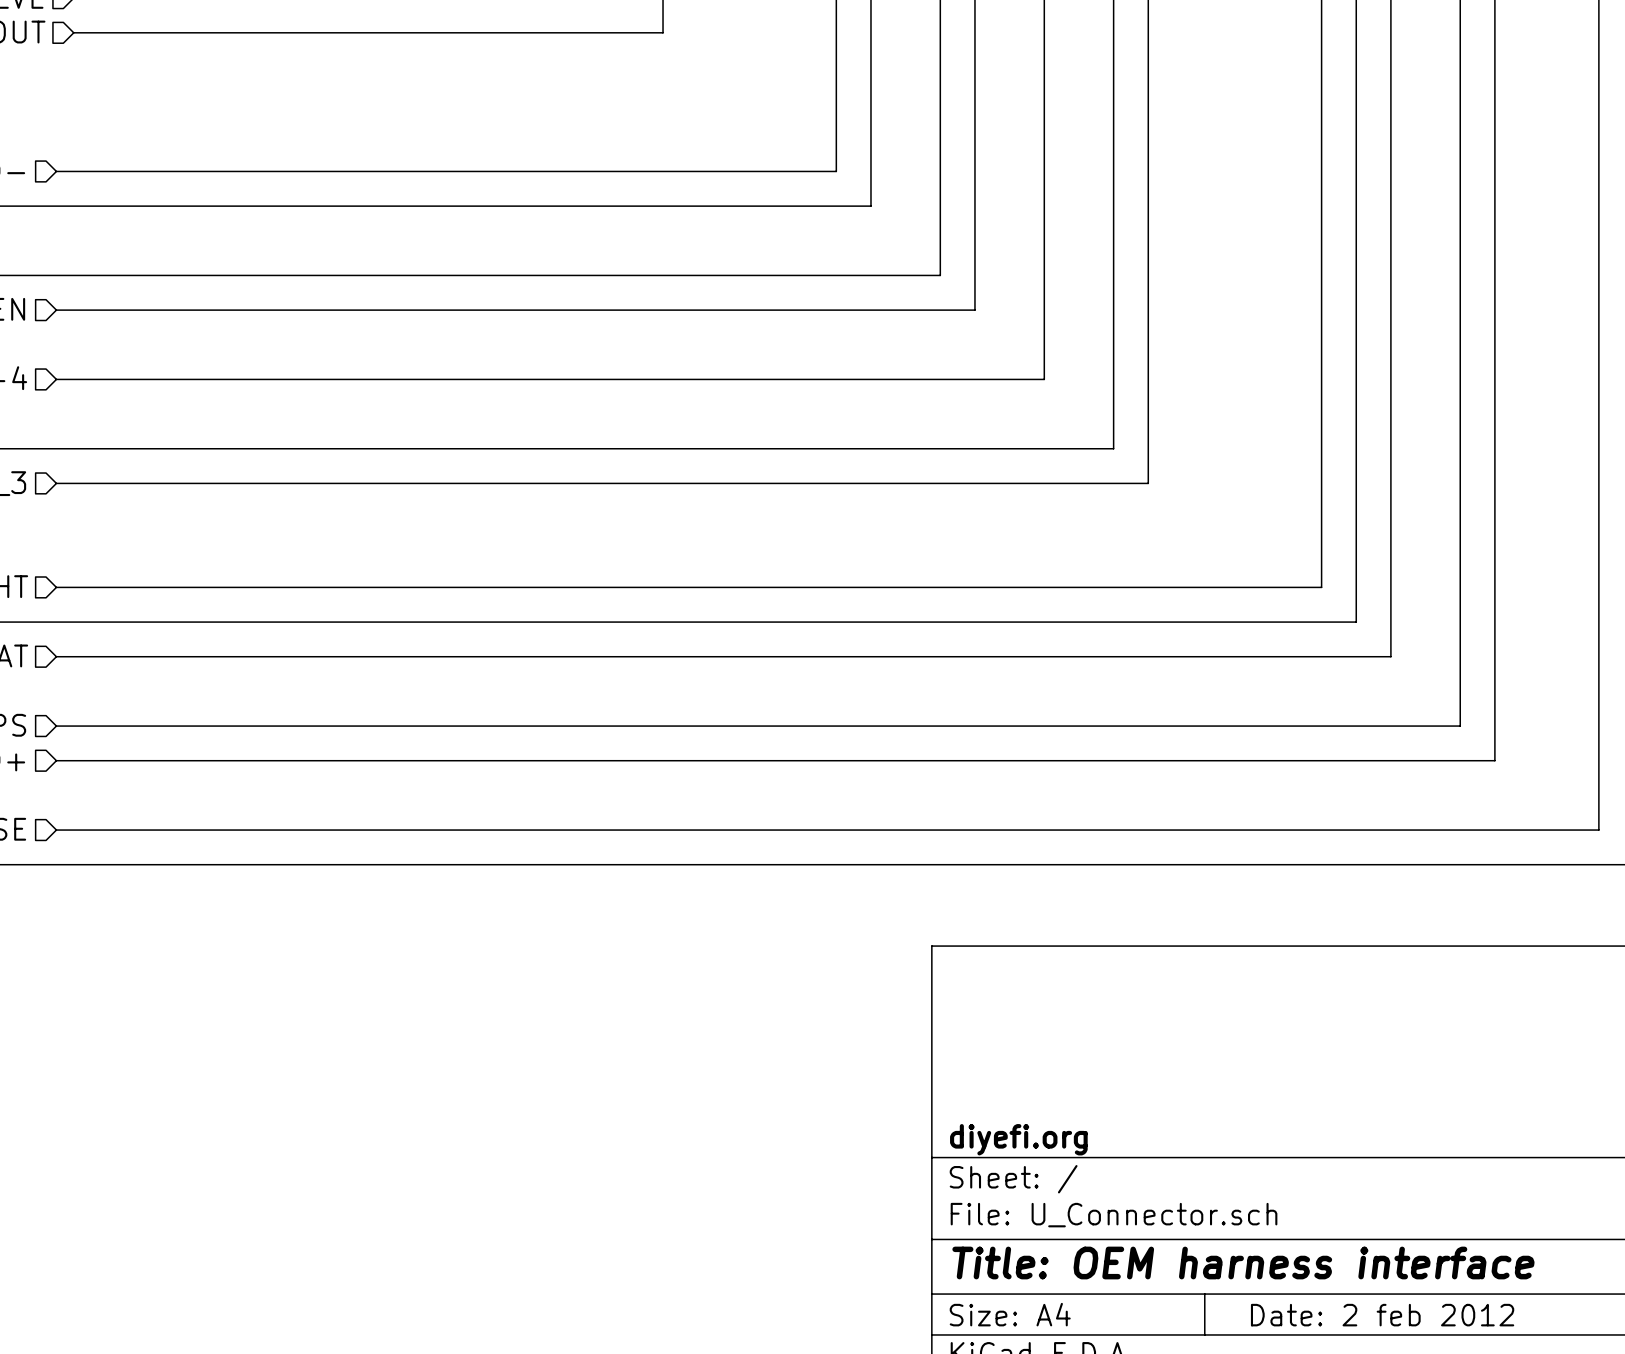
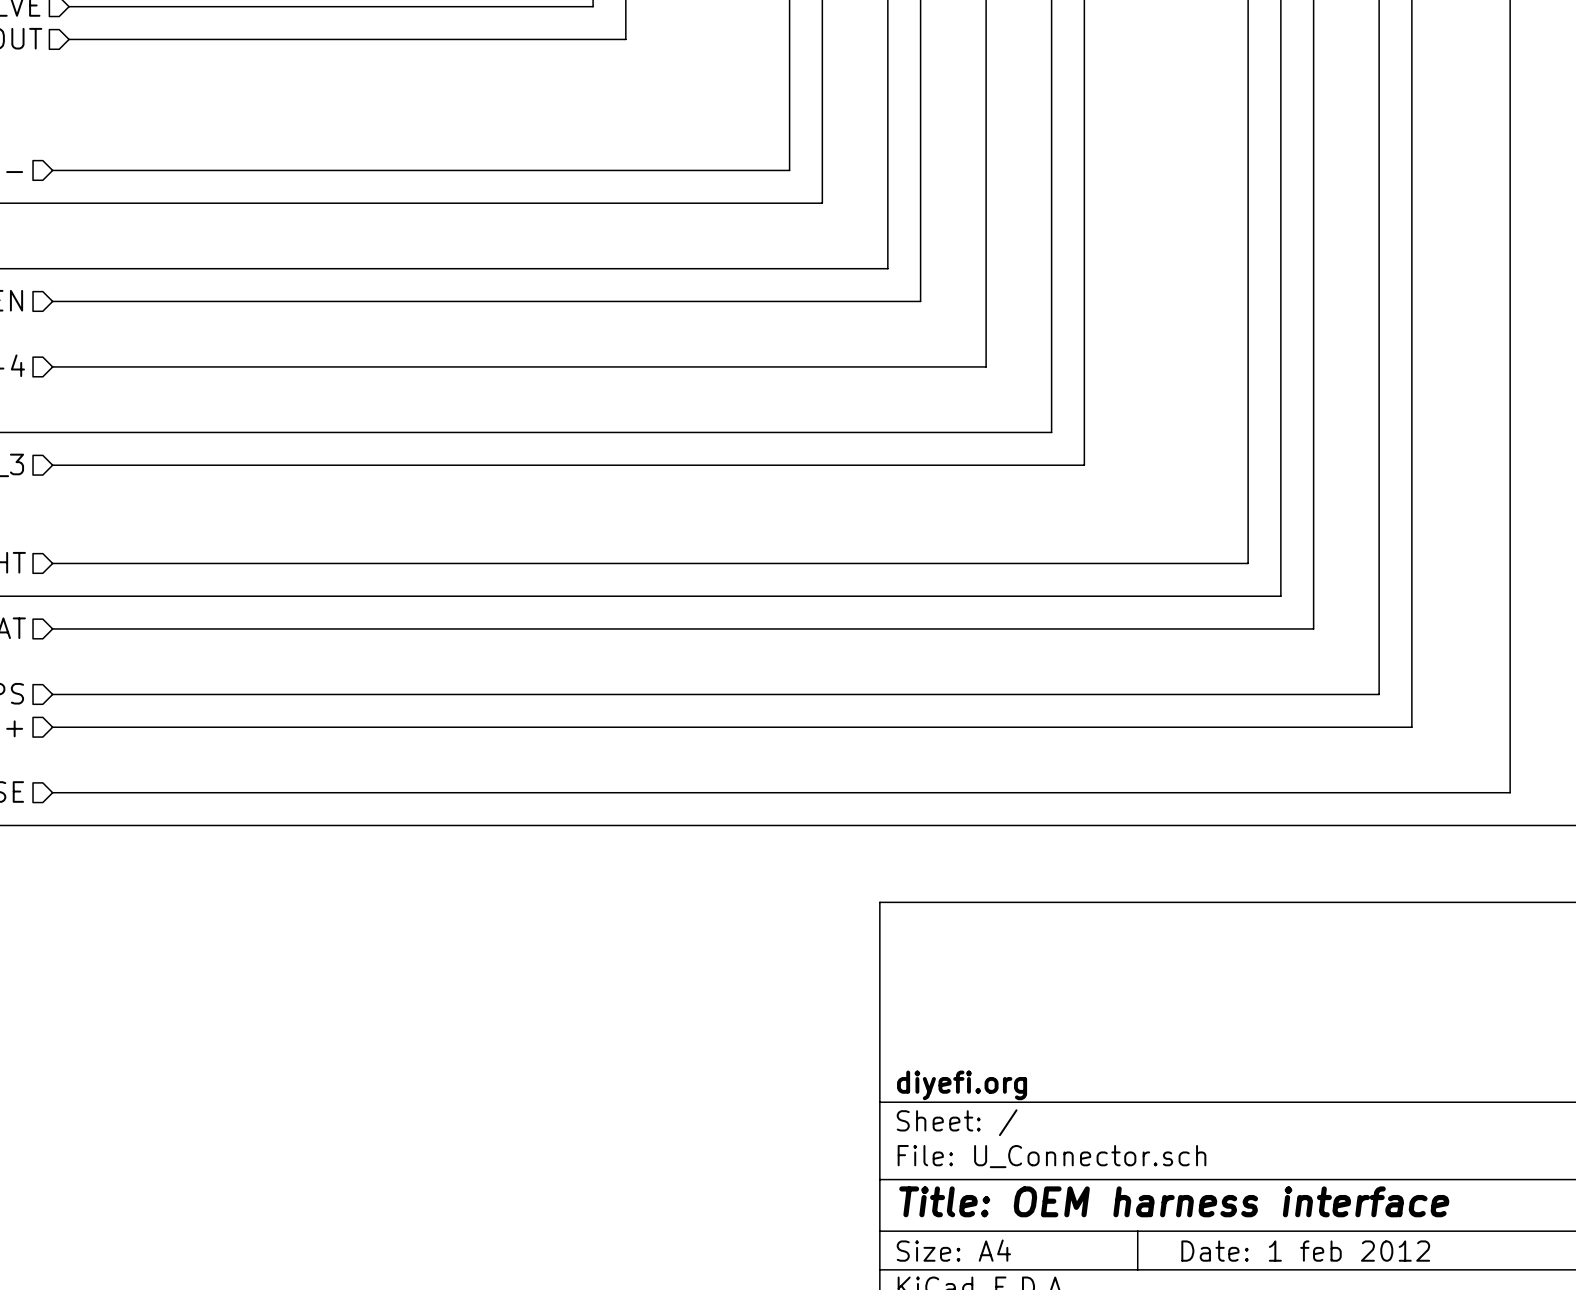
title block: Date: 2 feb 2012 (1382, 1315) -> Date: 1 feb 2012 (1305, 1251)

